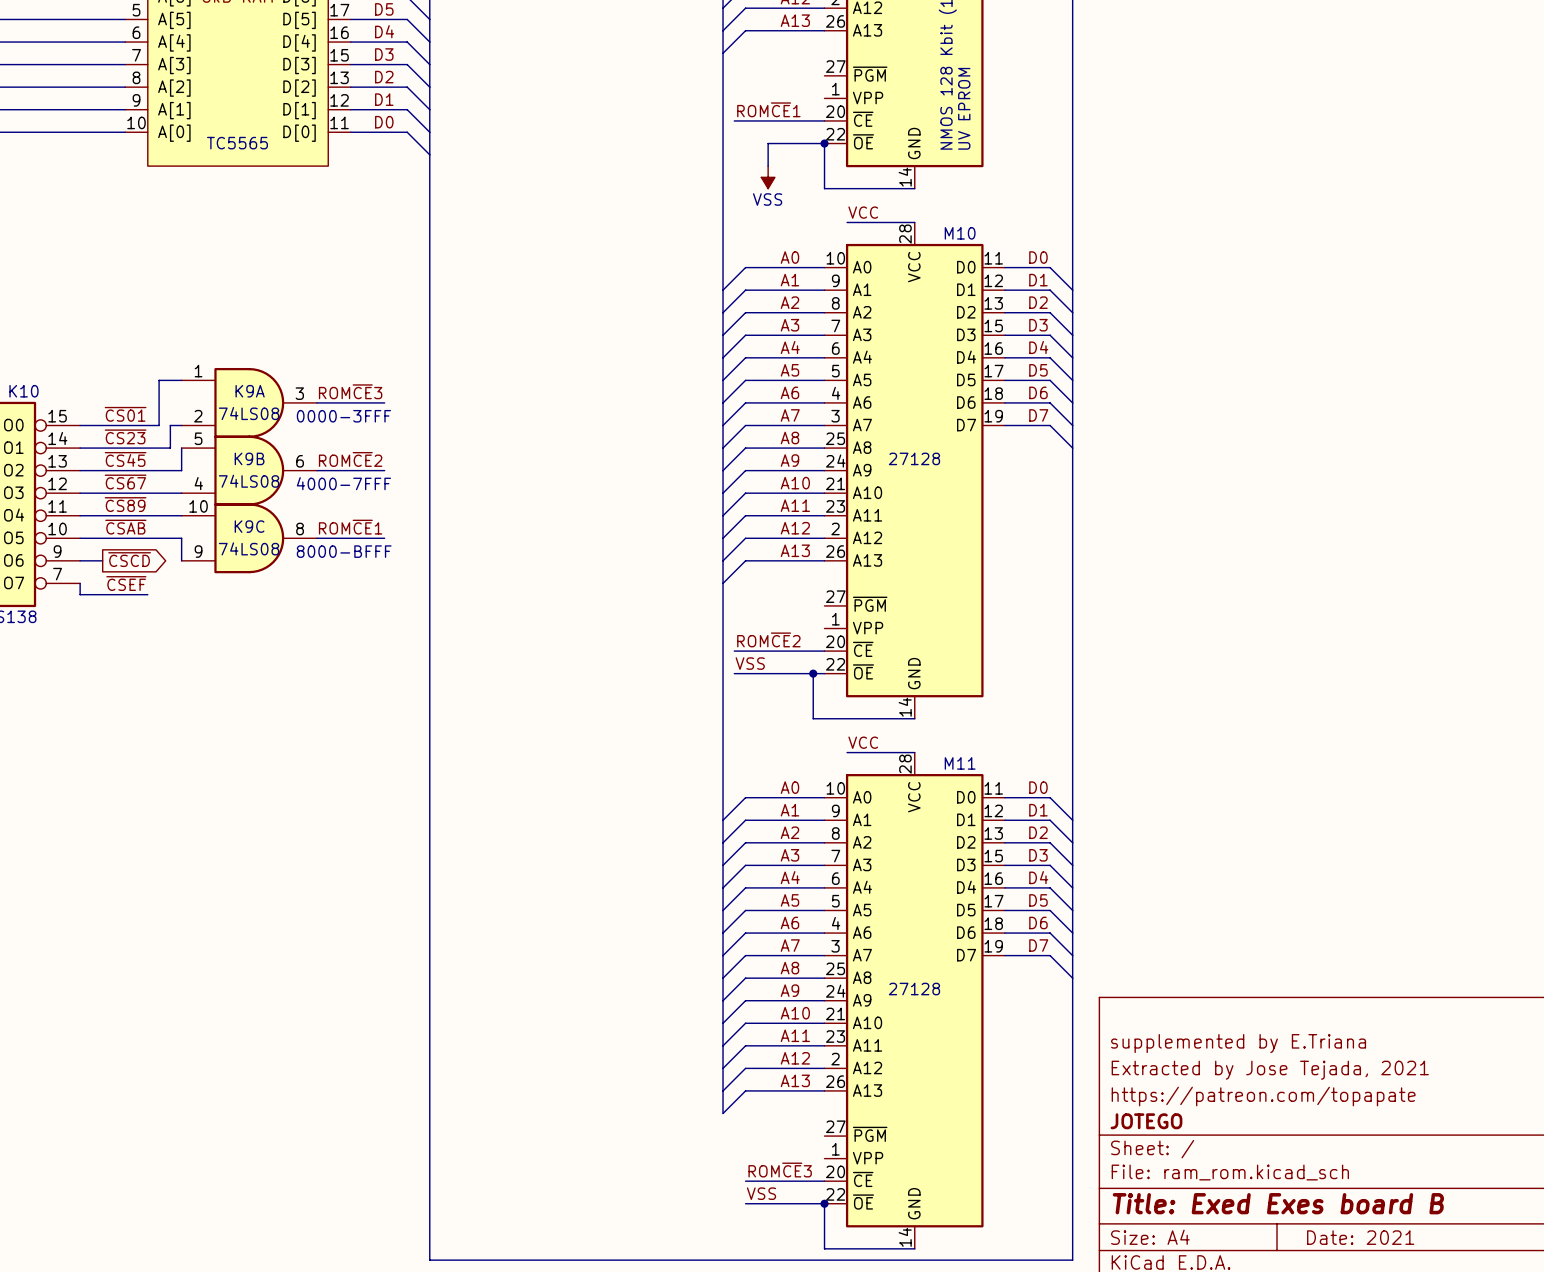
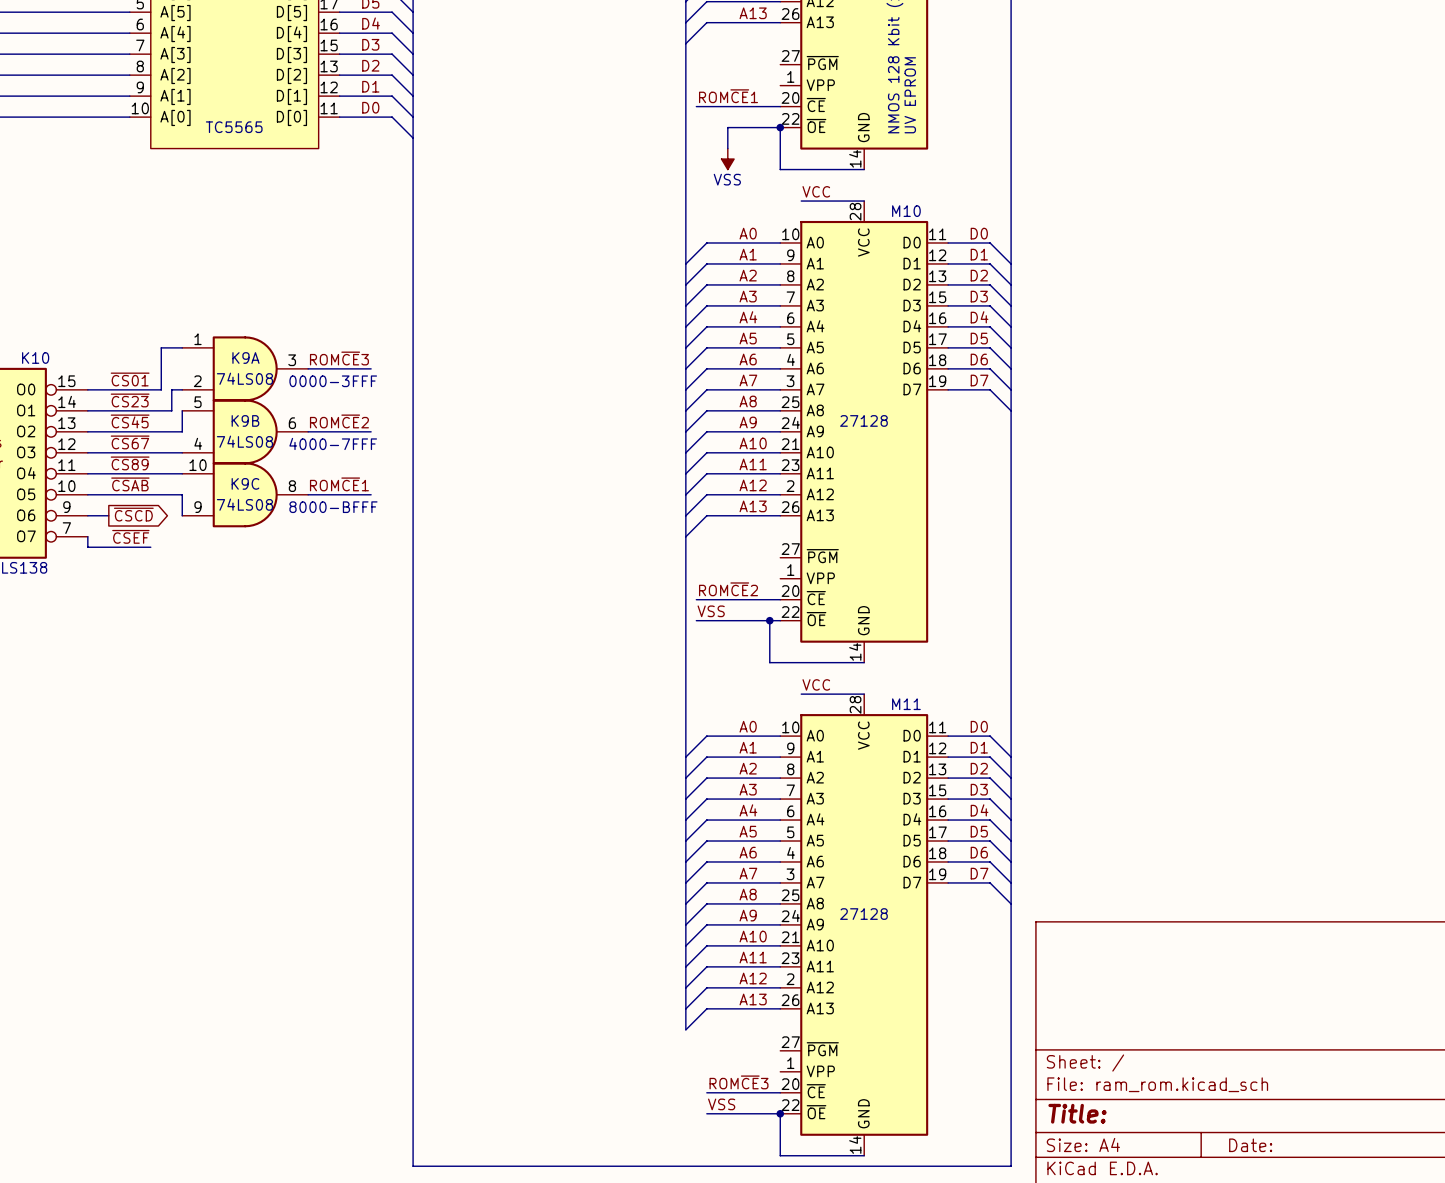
title block: supplemented by E.Triana (1238, 1043) -> none
title block: Extracted by Jose Tejada, 2021 (1270, 1070) -> none
title block: https://patreon.com/topapate (1263, 1096) -> none
title block: JOTEGO (1146, 1121) -> none
title block: Title: Exed Exes board B (1278, 1203) -> Title: (1077, 1113)
title block: Date: 2021 (1360, 1237) -> Date: (1250, 1145)

